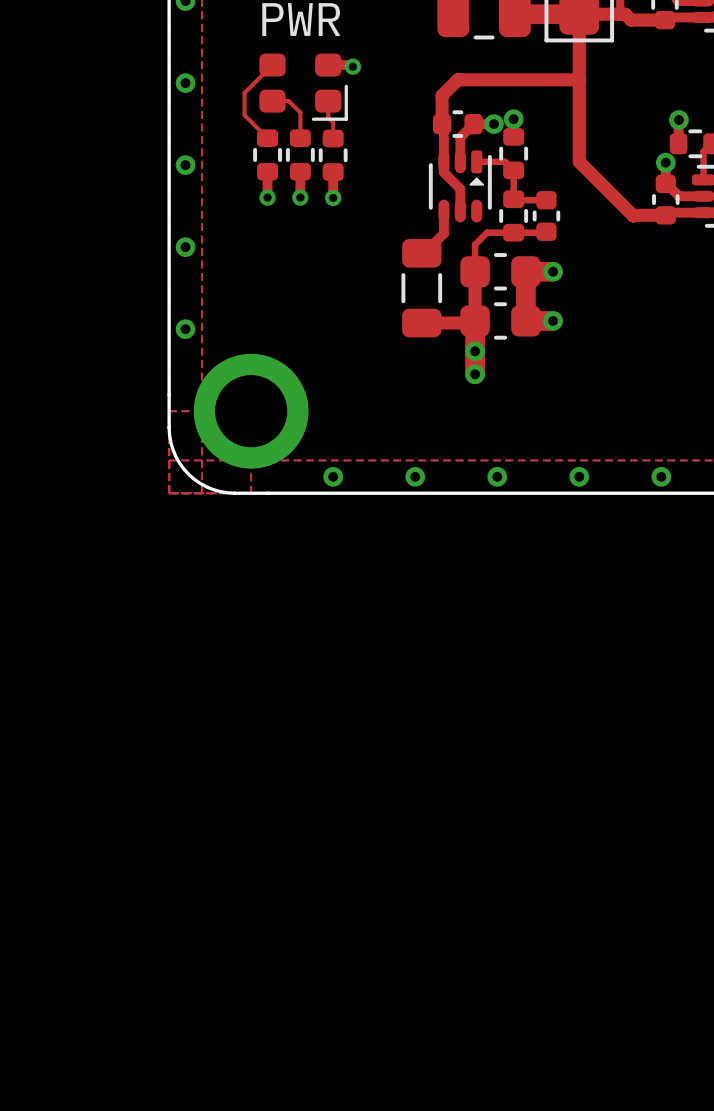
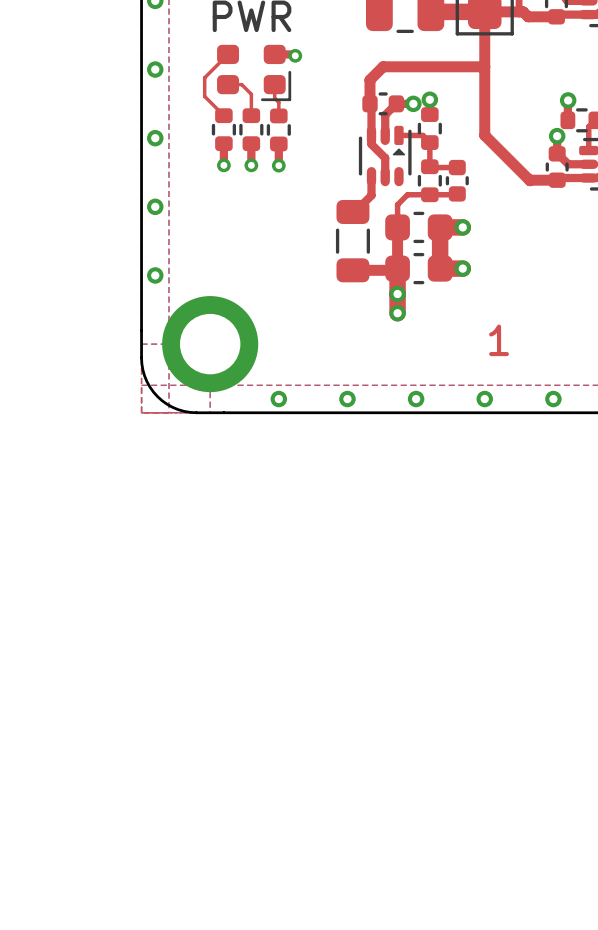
text: none -> 1 (499, 340)

